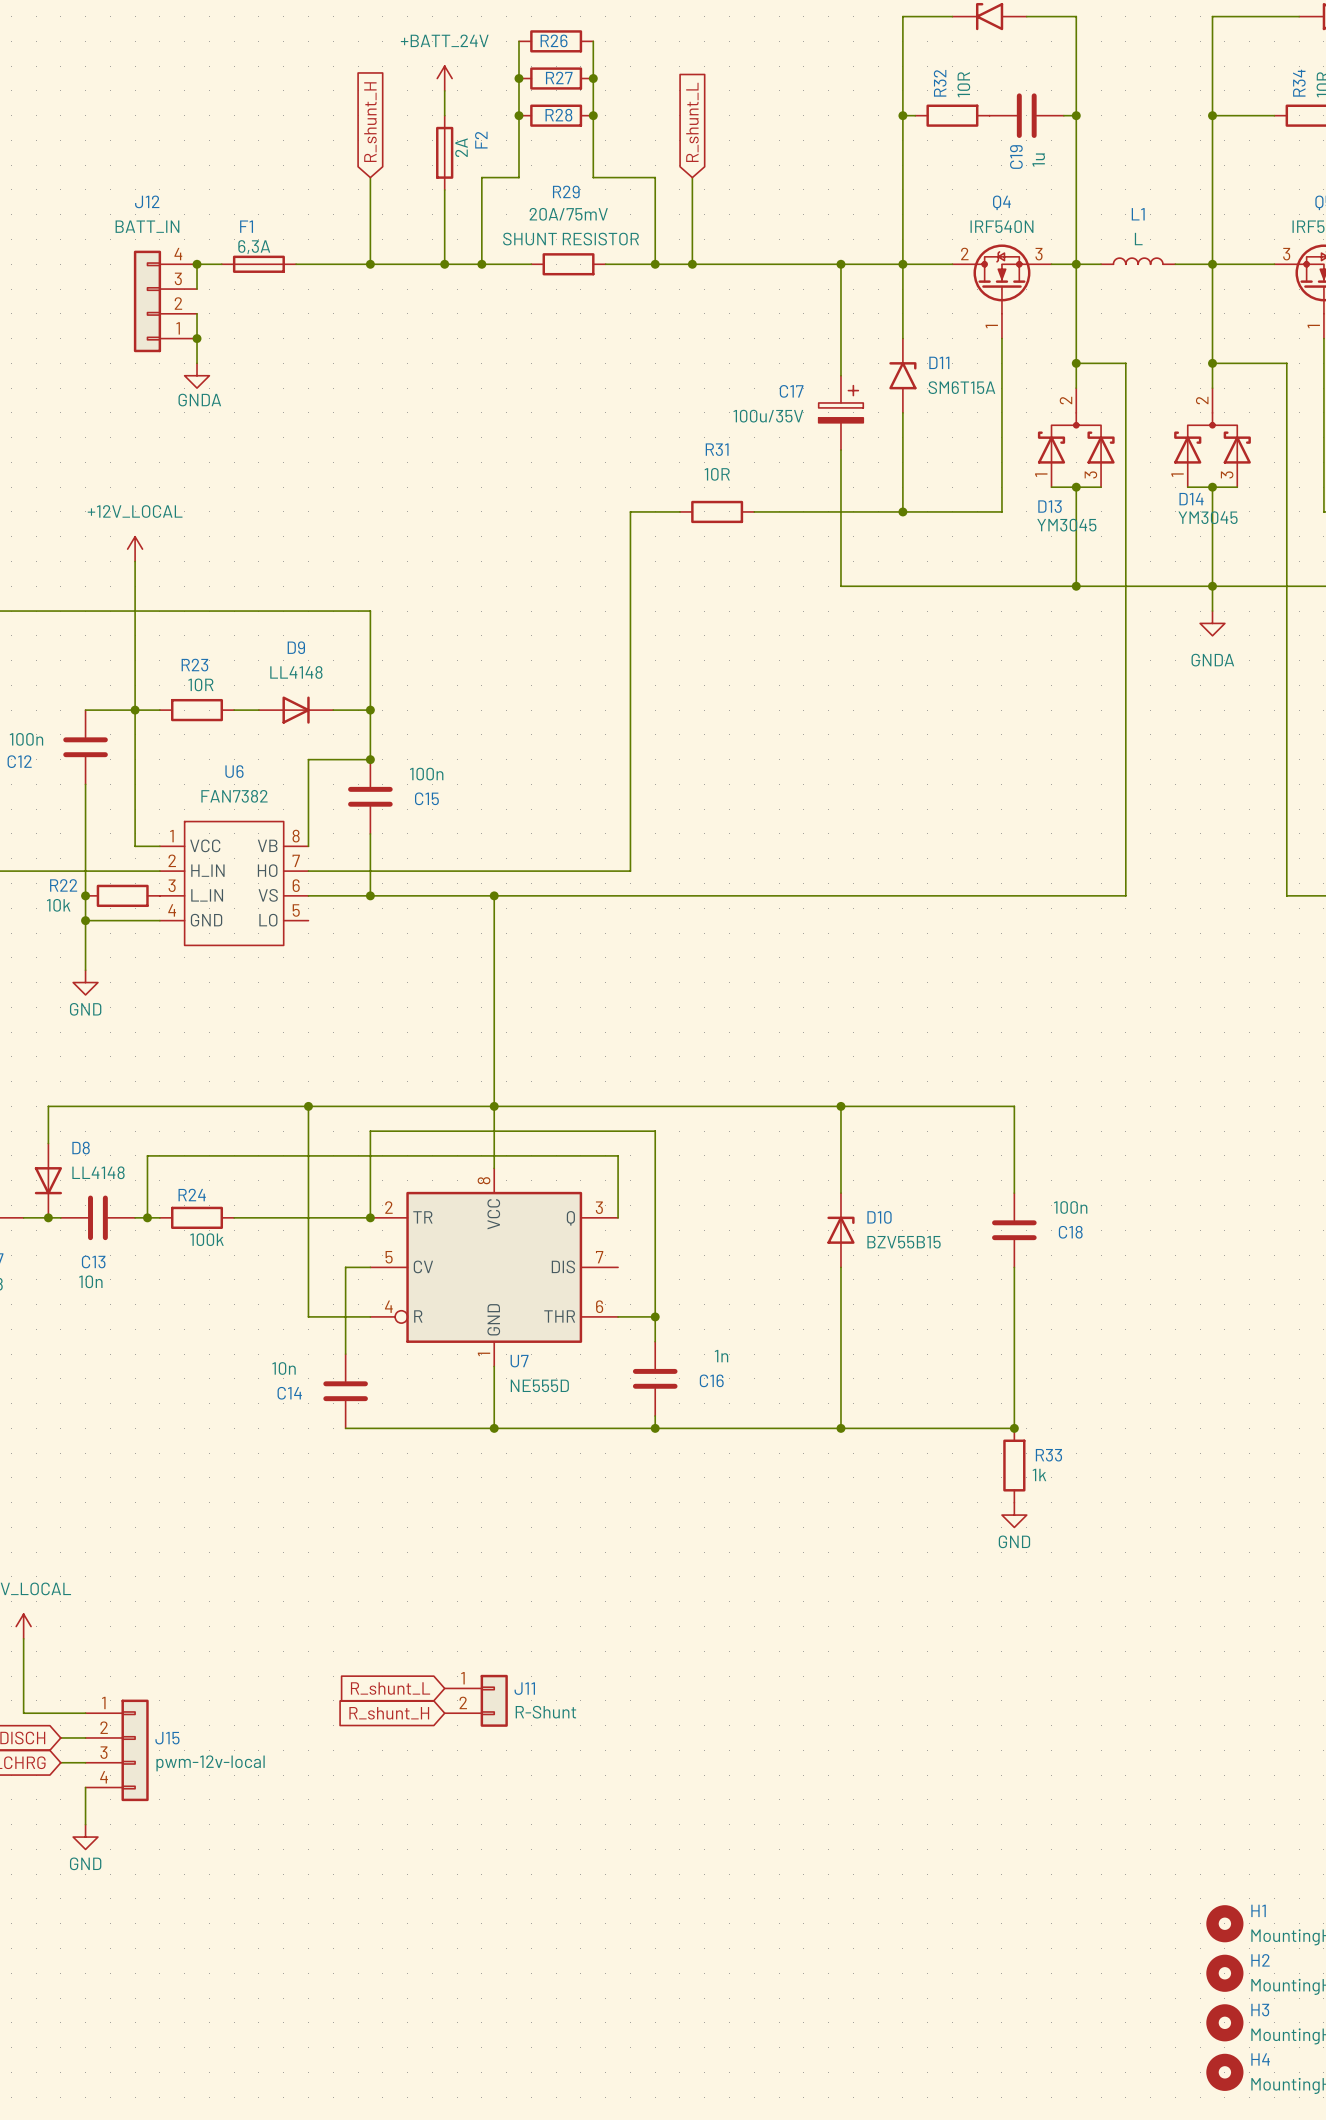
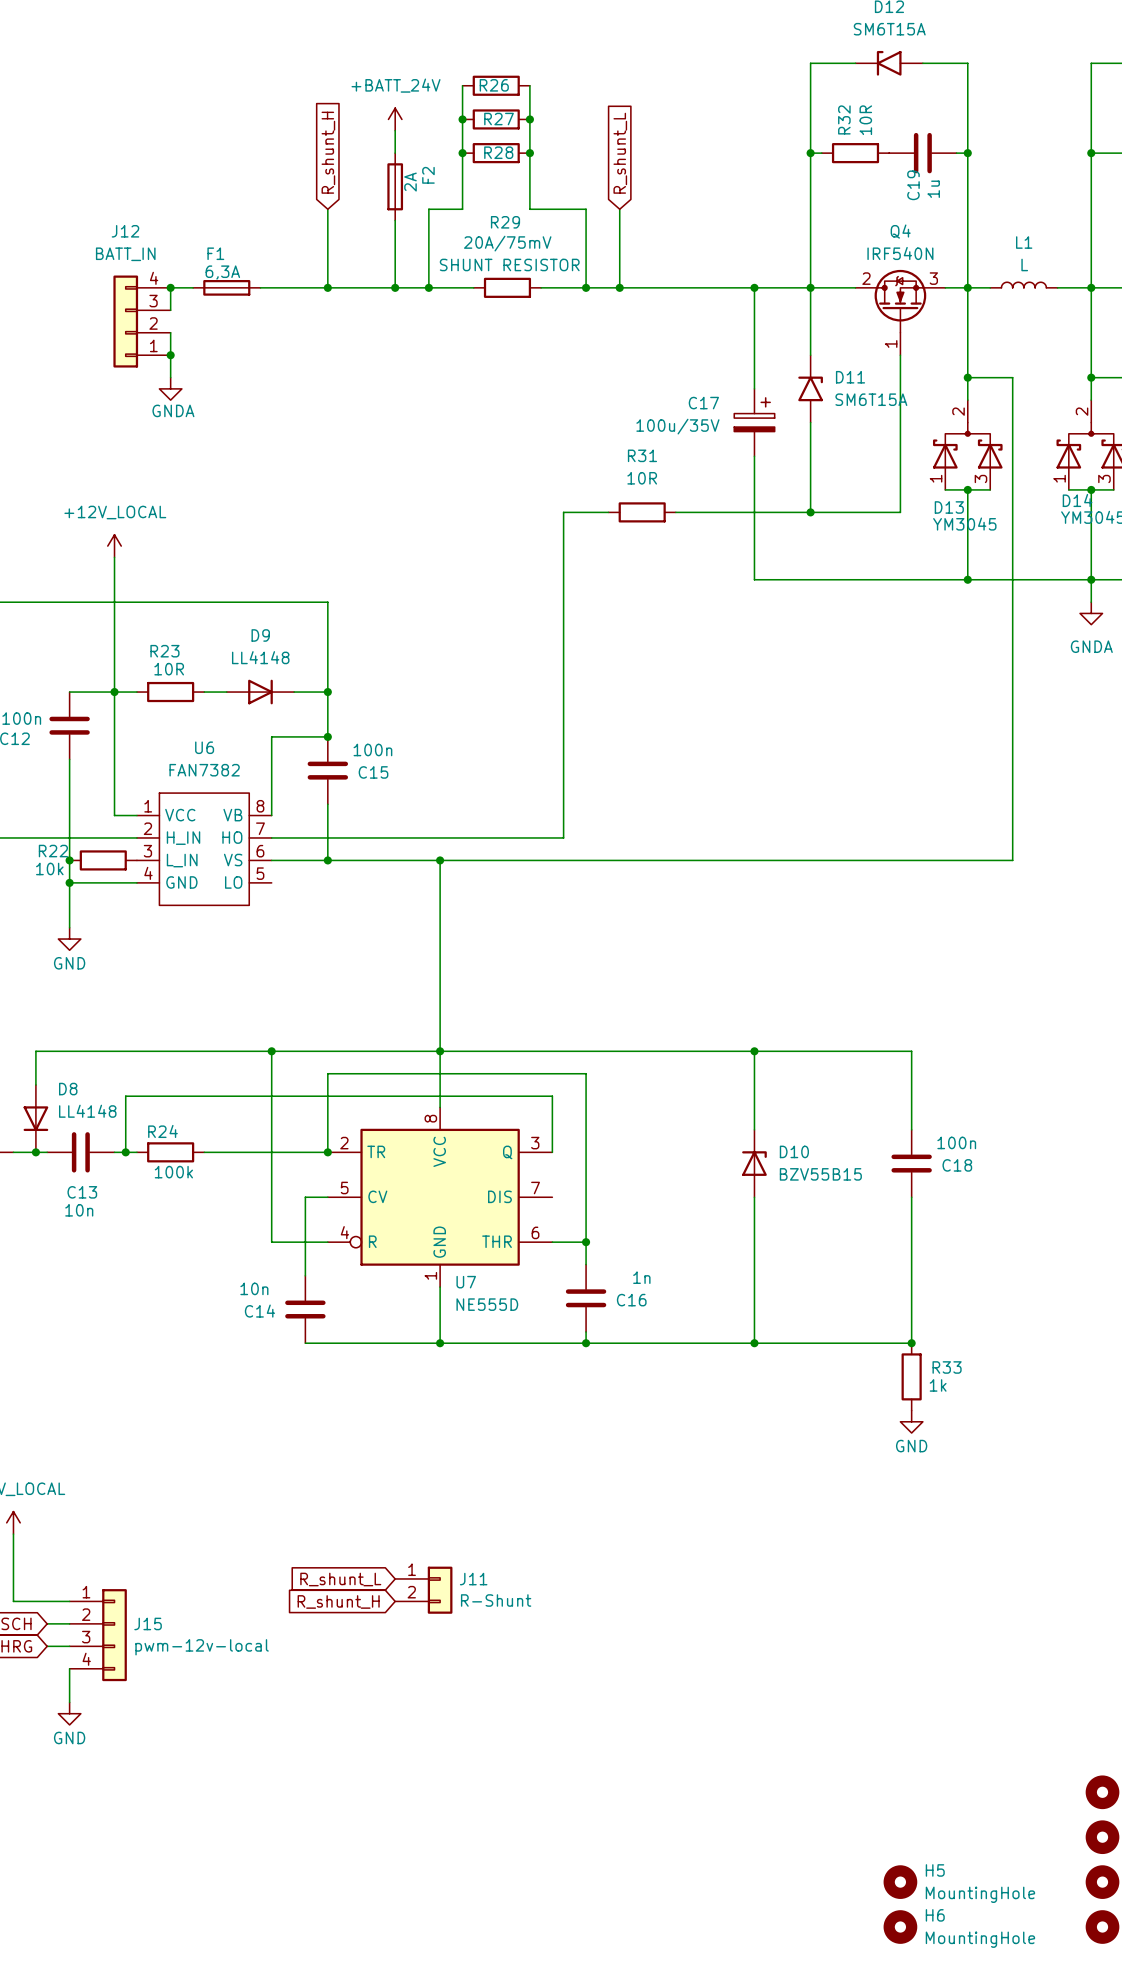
H5: none -> MountingHole (900, 1882)
H6: none -> MountingHole (900, 1927)

